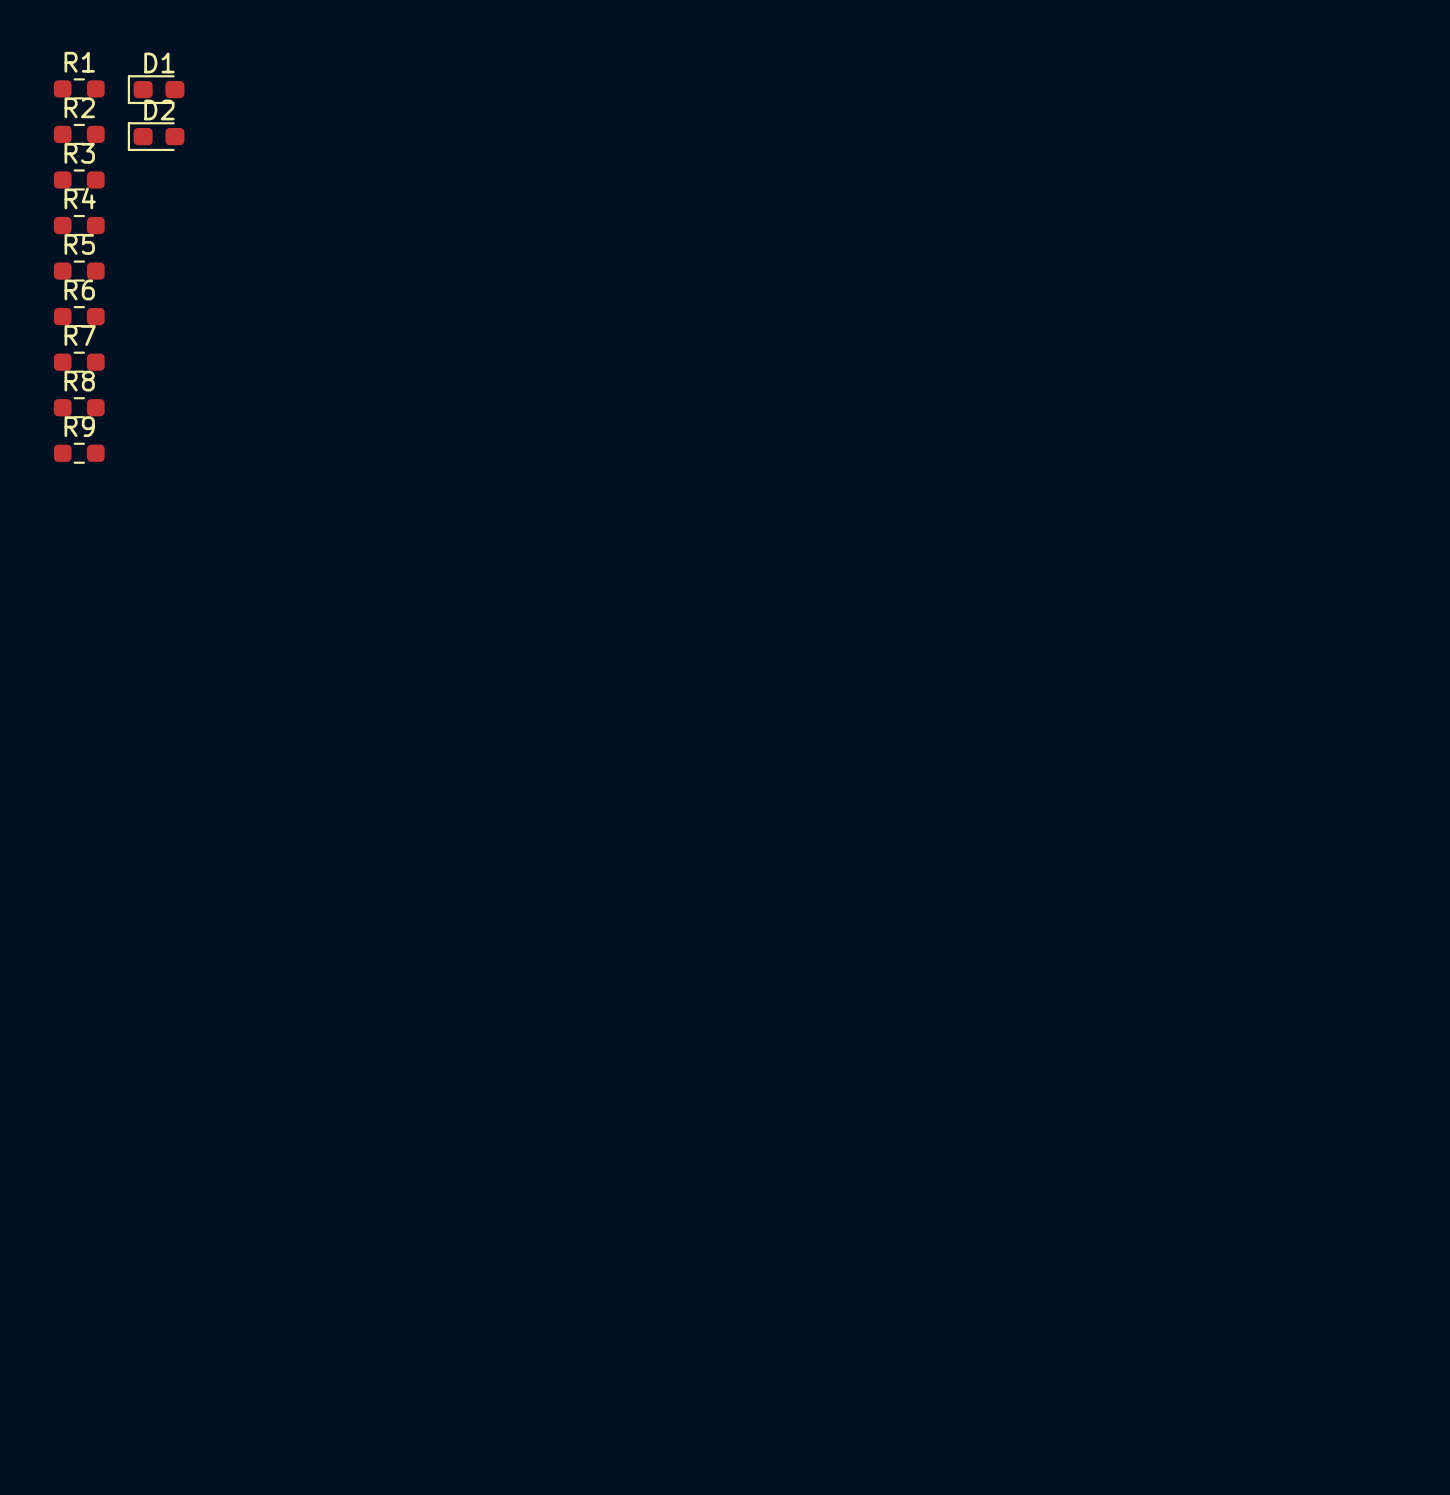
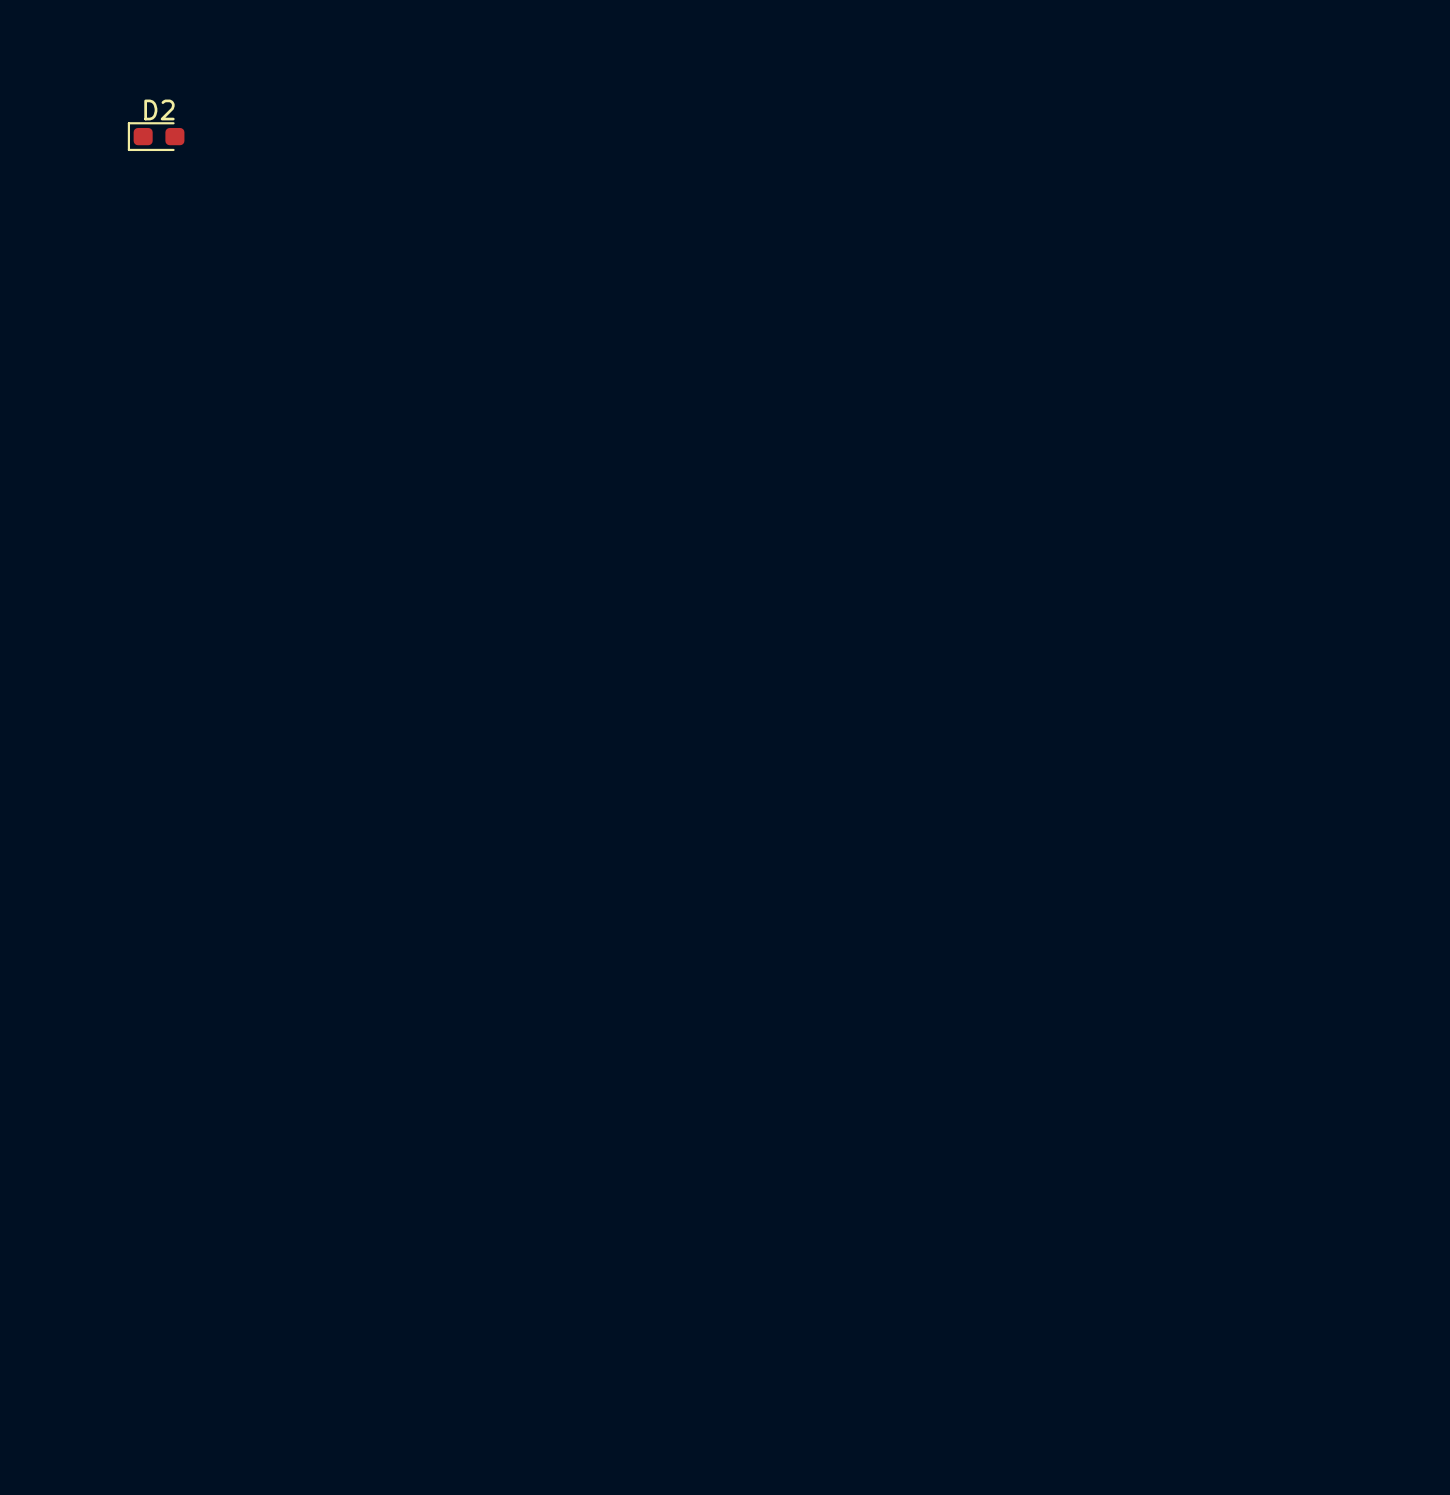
R1: (79, 88) -> none
D1: (156, 89) -> none
R2: (79, 134) -> none
R3: (79, 179) -> none
R4: (79, 225) -> none
R5: (79, 271) -> none
R6: (79, 316) -> none
R7: (79, 362) -> none
R8: (79, 407) -> none
R9: (79, 453) -> none

